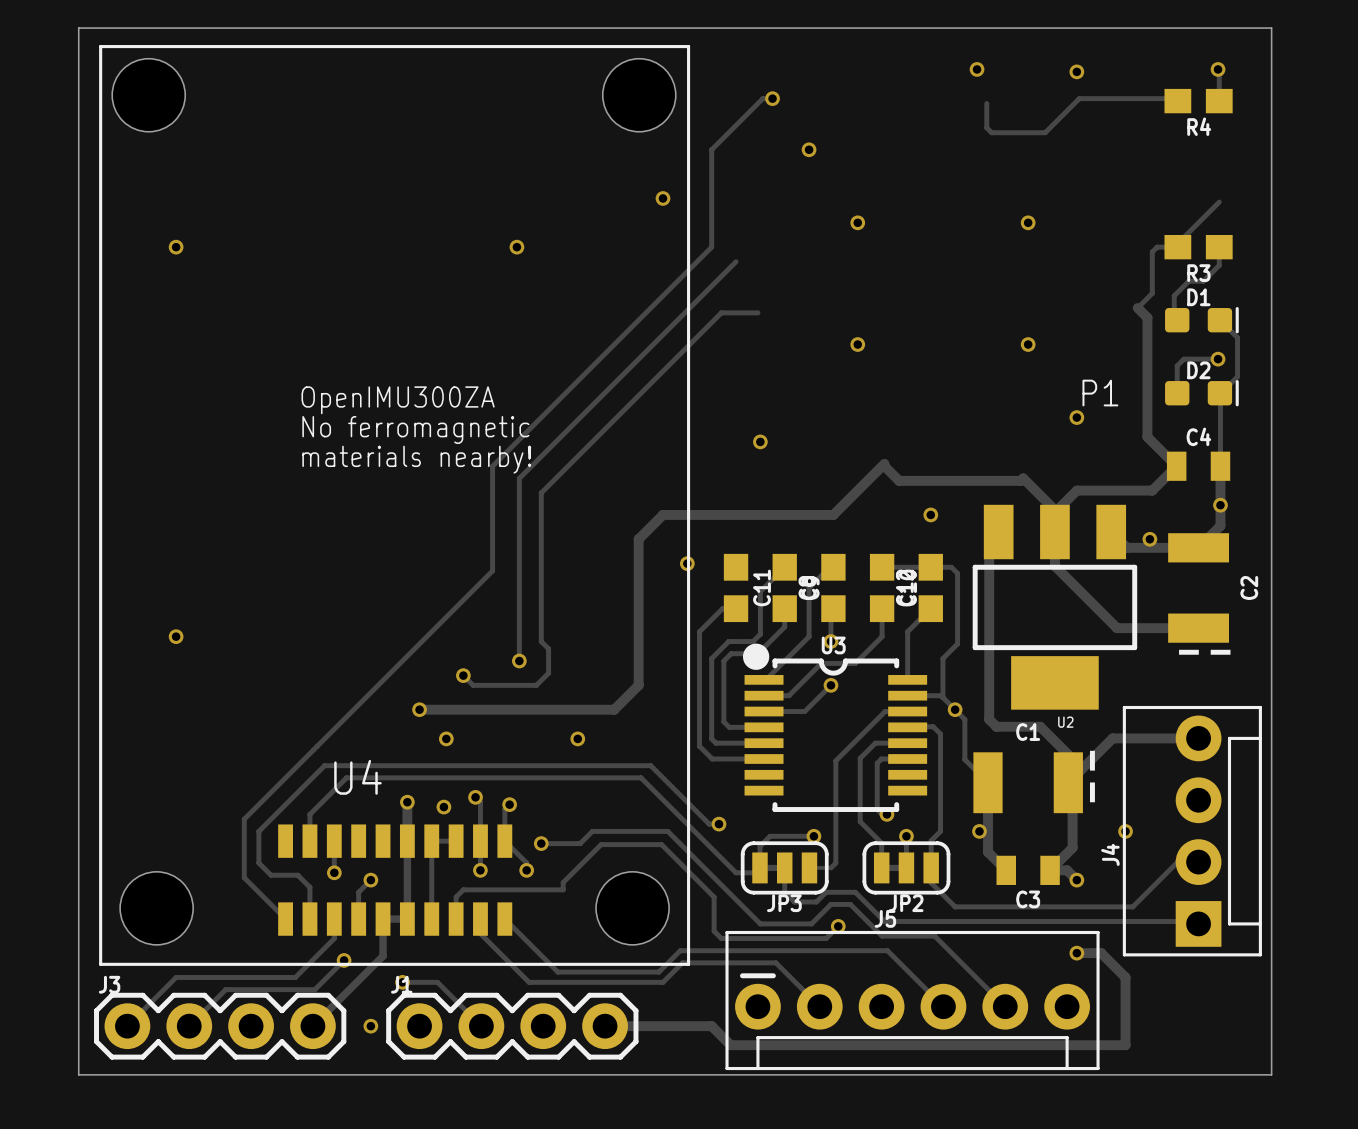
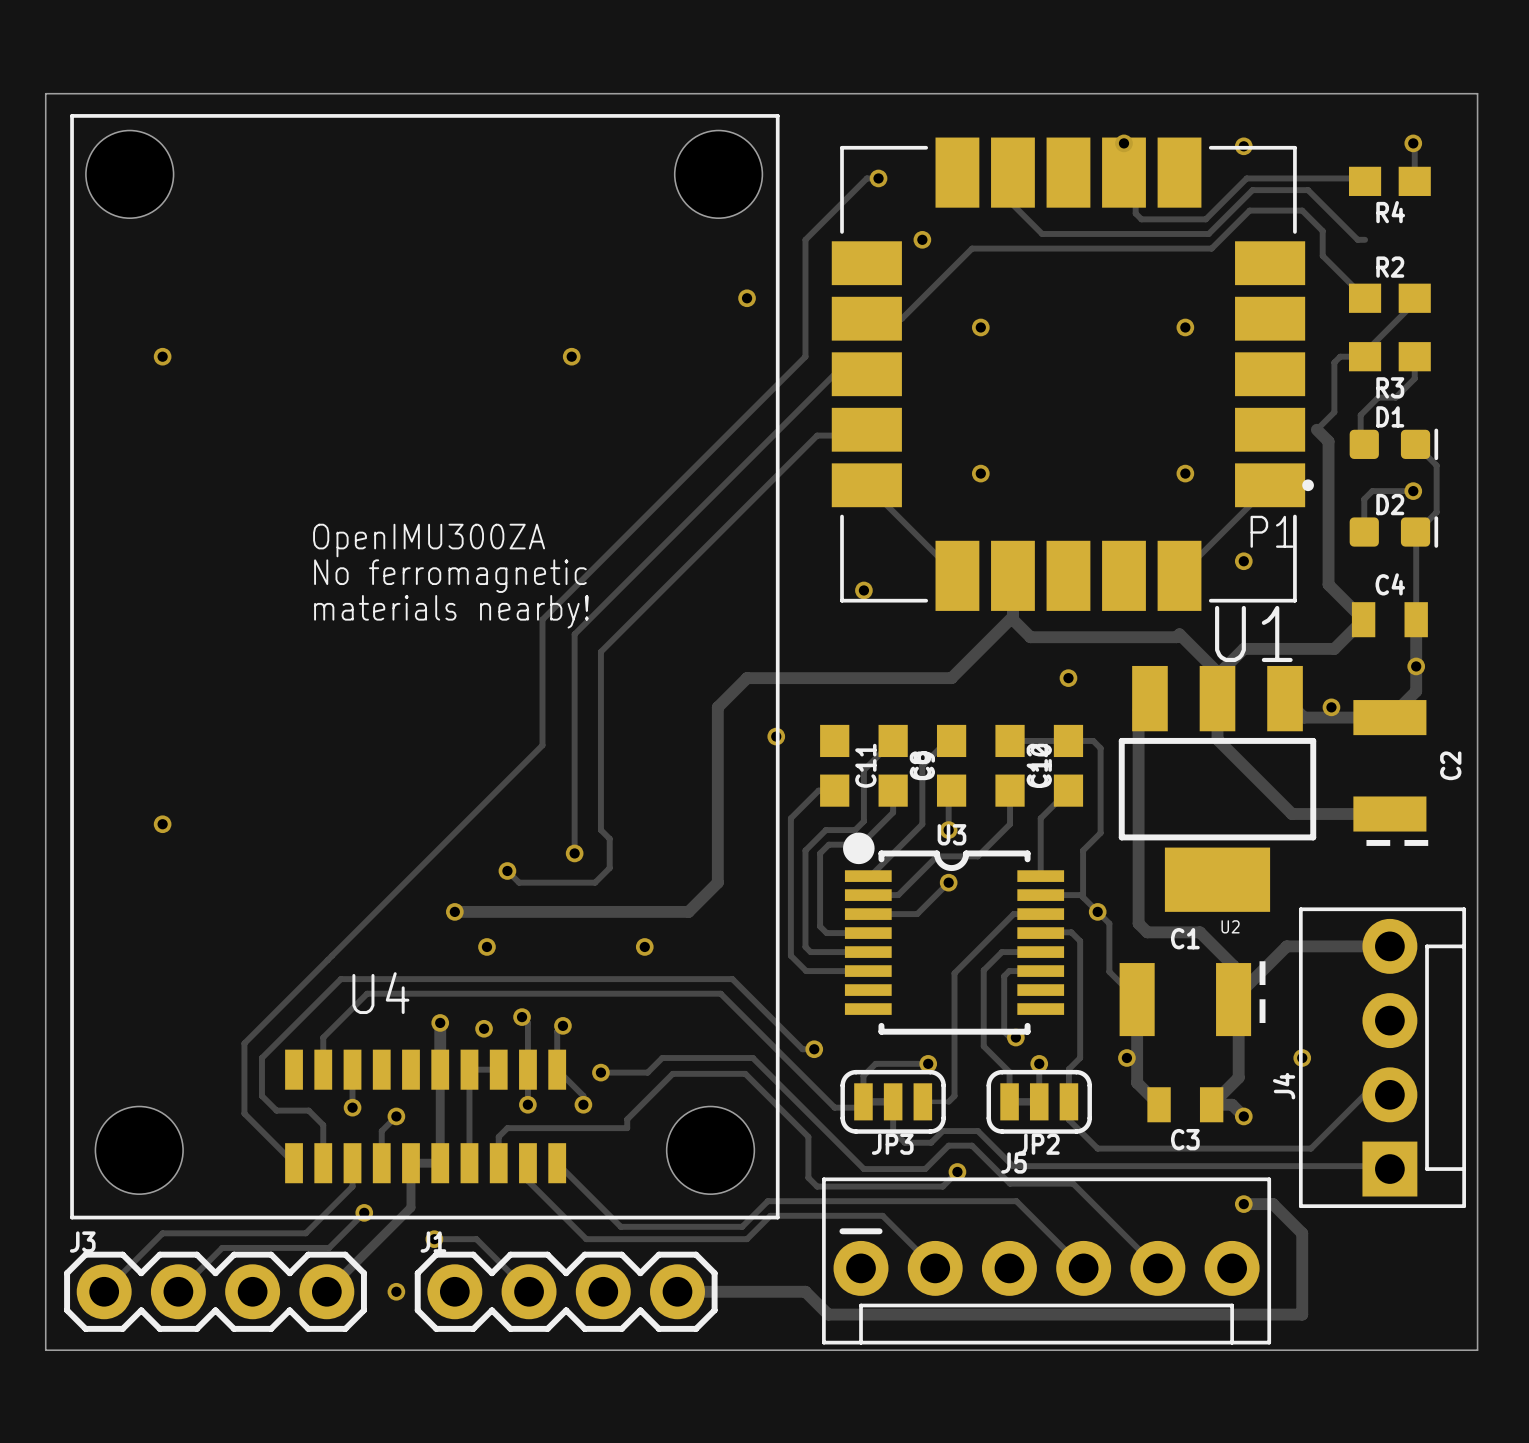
track: none -> (1012, 172) (1010, 175) (1010, 201) (1042, 233) (1208, 233) (1252, 190) (1308, 190) (1357, 239) (1365, 239)
track: none -> (1365, 298) (1322, 255) (1322, 231) (1302, 210) (1249, 210) (1211, 248) (972, 248) (901, 318) (866, 318)
R2: none -> (1389, 298)
U1: none -> (1072, 374)
track: none -> (866, 485) (957, 575)
track: none -> (1270, 485) (1179, 575)

